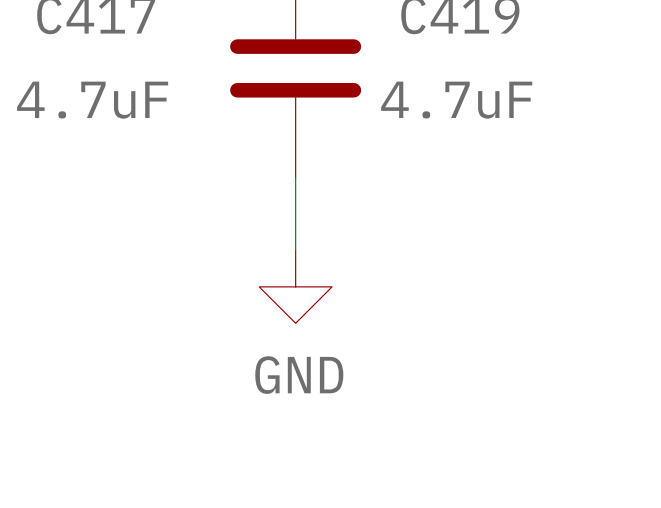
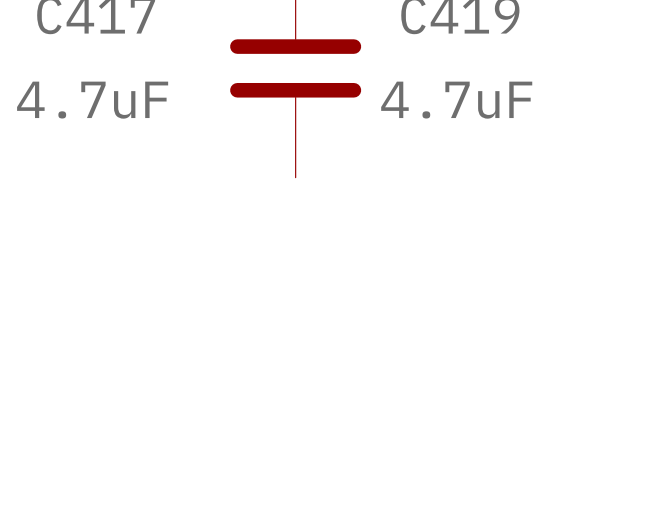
wire: (295, 177) (295, 250) -> none
power symbol: GND (295, 286) -> none

